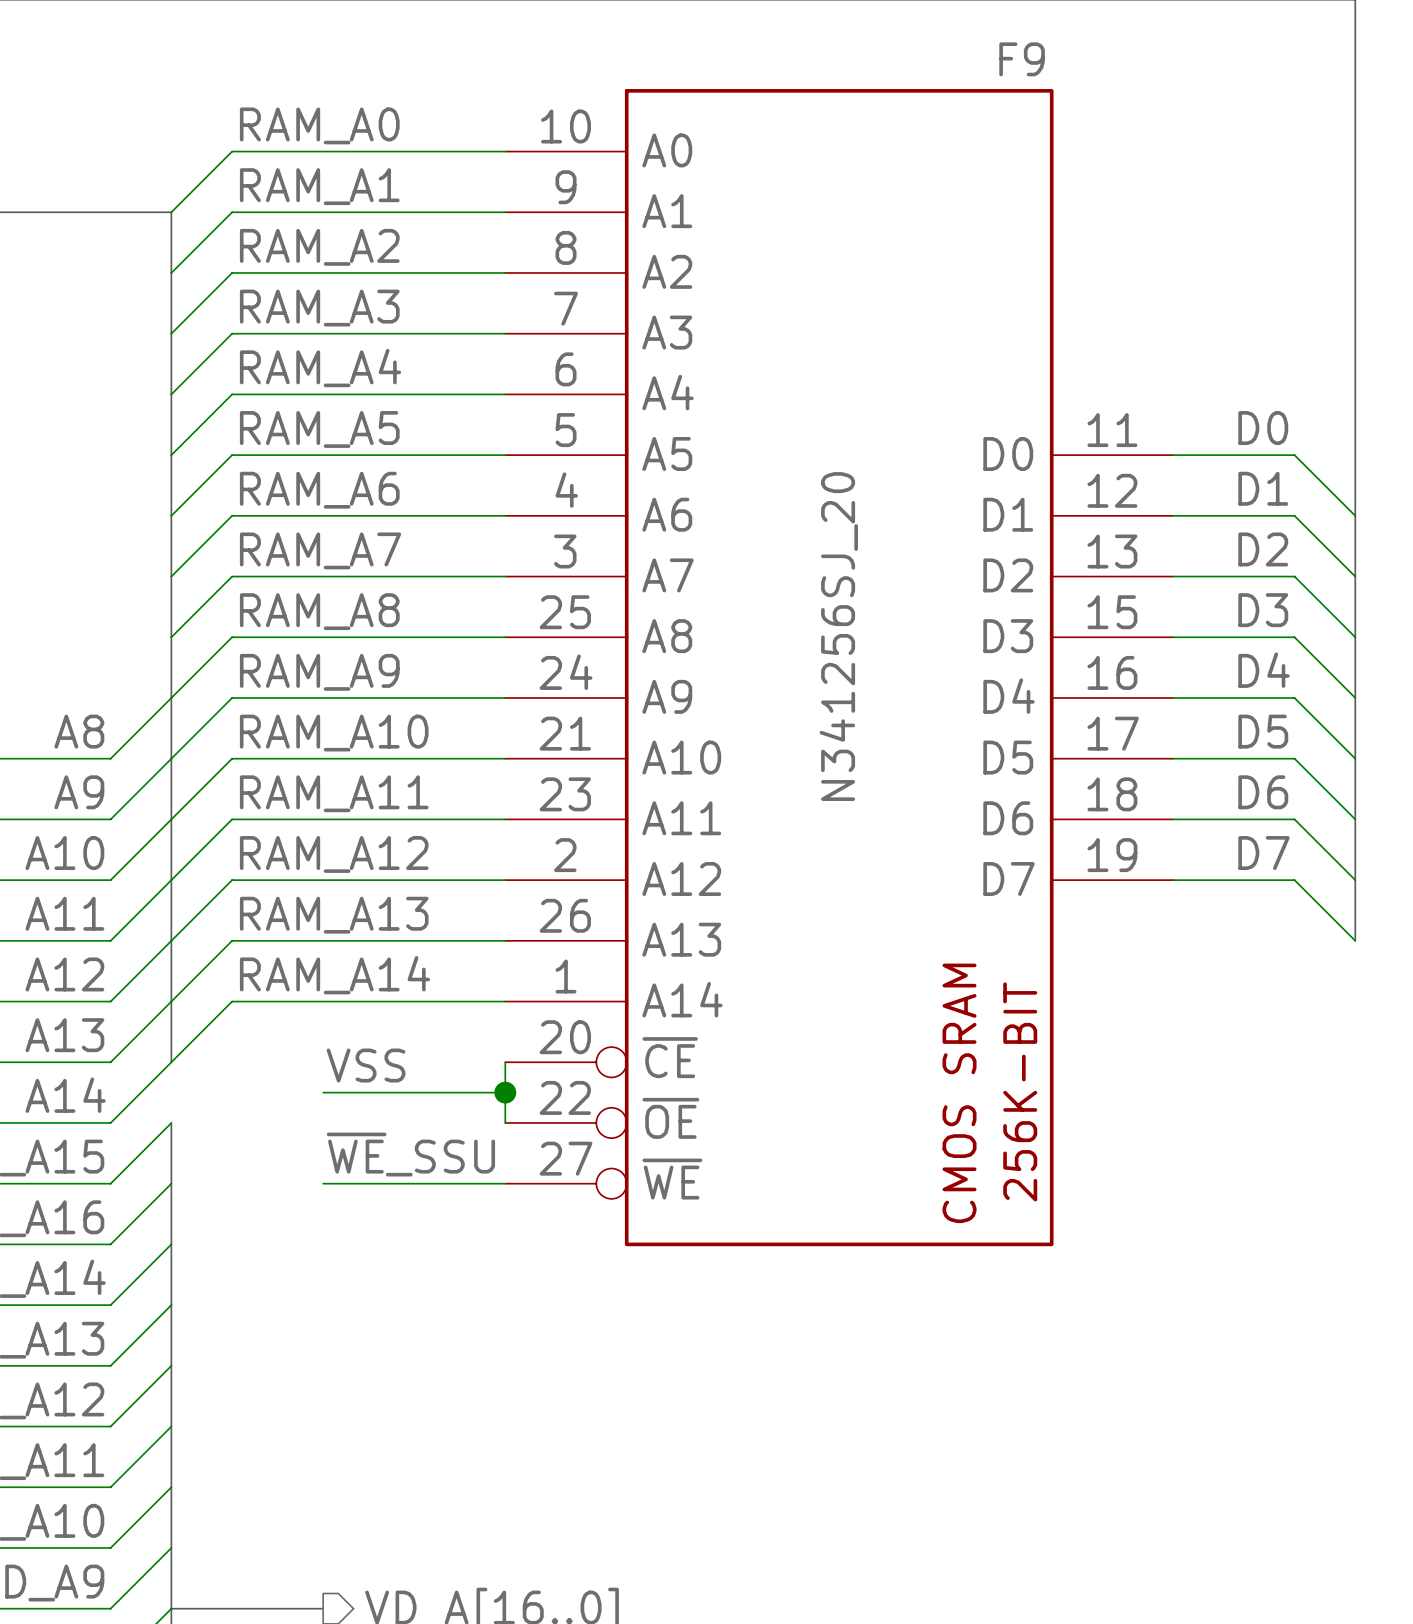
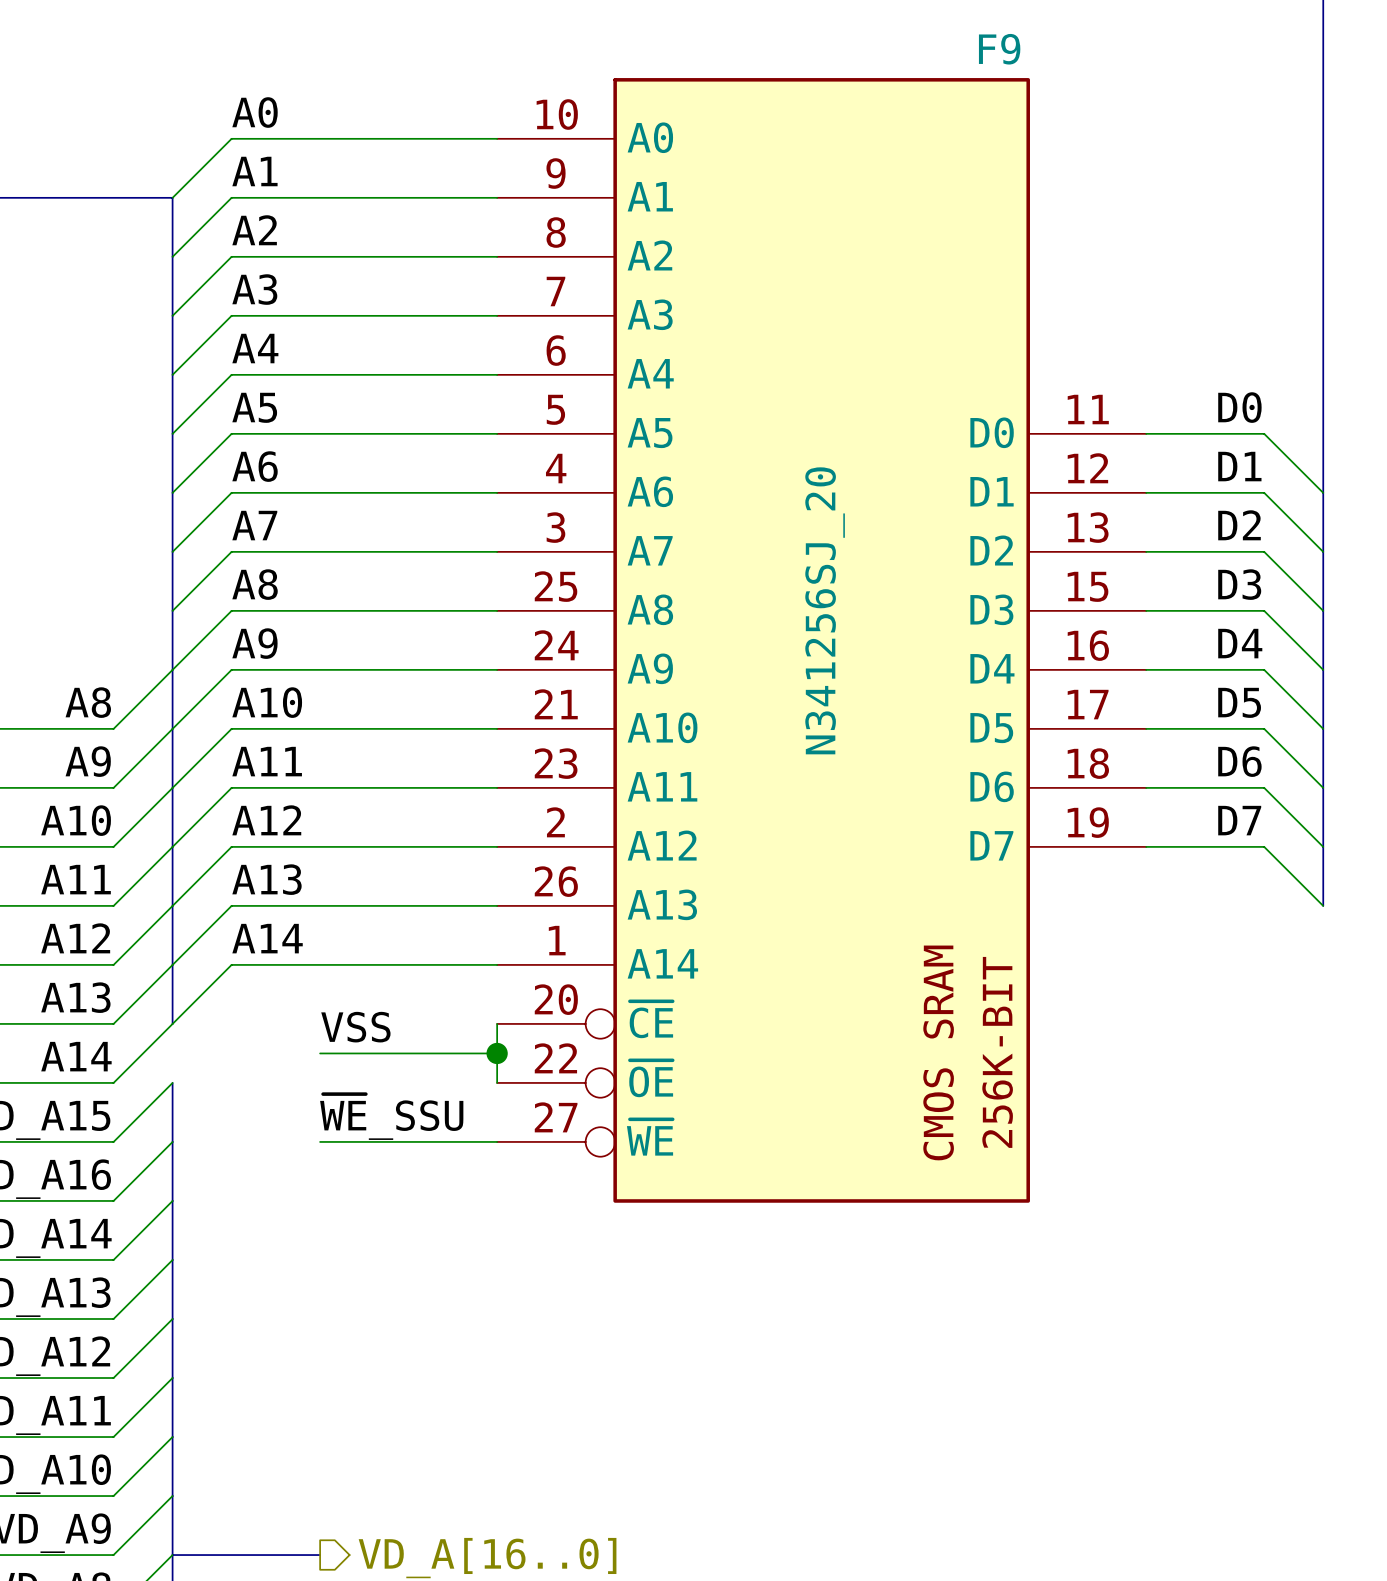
label: RAM_A0 (319, 125) -> A0 (255, 112)
label: RAM_A1 (319, 186) -> A1 (254, 171)
label: RAM_A2 (319, 247) -> A2 (254, 230)
label: RAM_A3 (319, 308) -> A3 (254, 289)
label: RAM_A4 (320, 368) -> A4 (255, 348)
label: RAM_A5 (319, 429) -> A5 (254, 407)
label: RAM_A6 (319, 490) -> A6 (255, 466)
label: RAM_A7 (320, 550) -> A7 (254, 525)
label: RAM_A8 (319, 611) -> A8 (255, 584)
label: RAM_A9 (319, 672) -> A9 (254, 643)
label: RAM_A10 (334, 733) -> A10 (267, 702)
label: RAM_A11 (334, 793) -> A11 (267, 761)
label: RAM_A12 (334, 854) -> A12 (266, 820)
label: RAM_A13 (334, 915) -> A13 (266, 879)
label: RAM_A14 (334, 975) -> A14 (267, 938)

